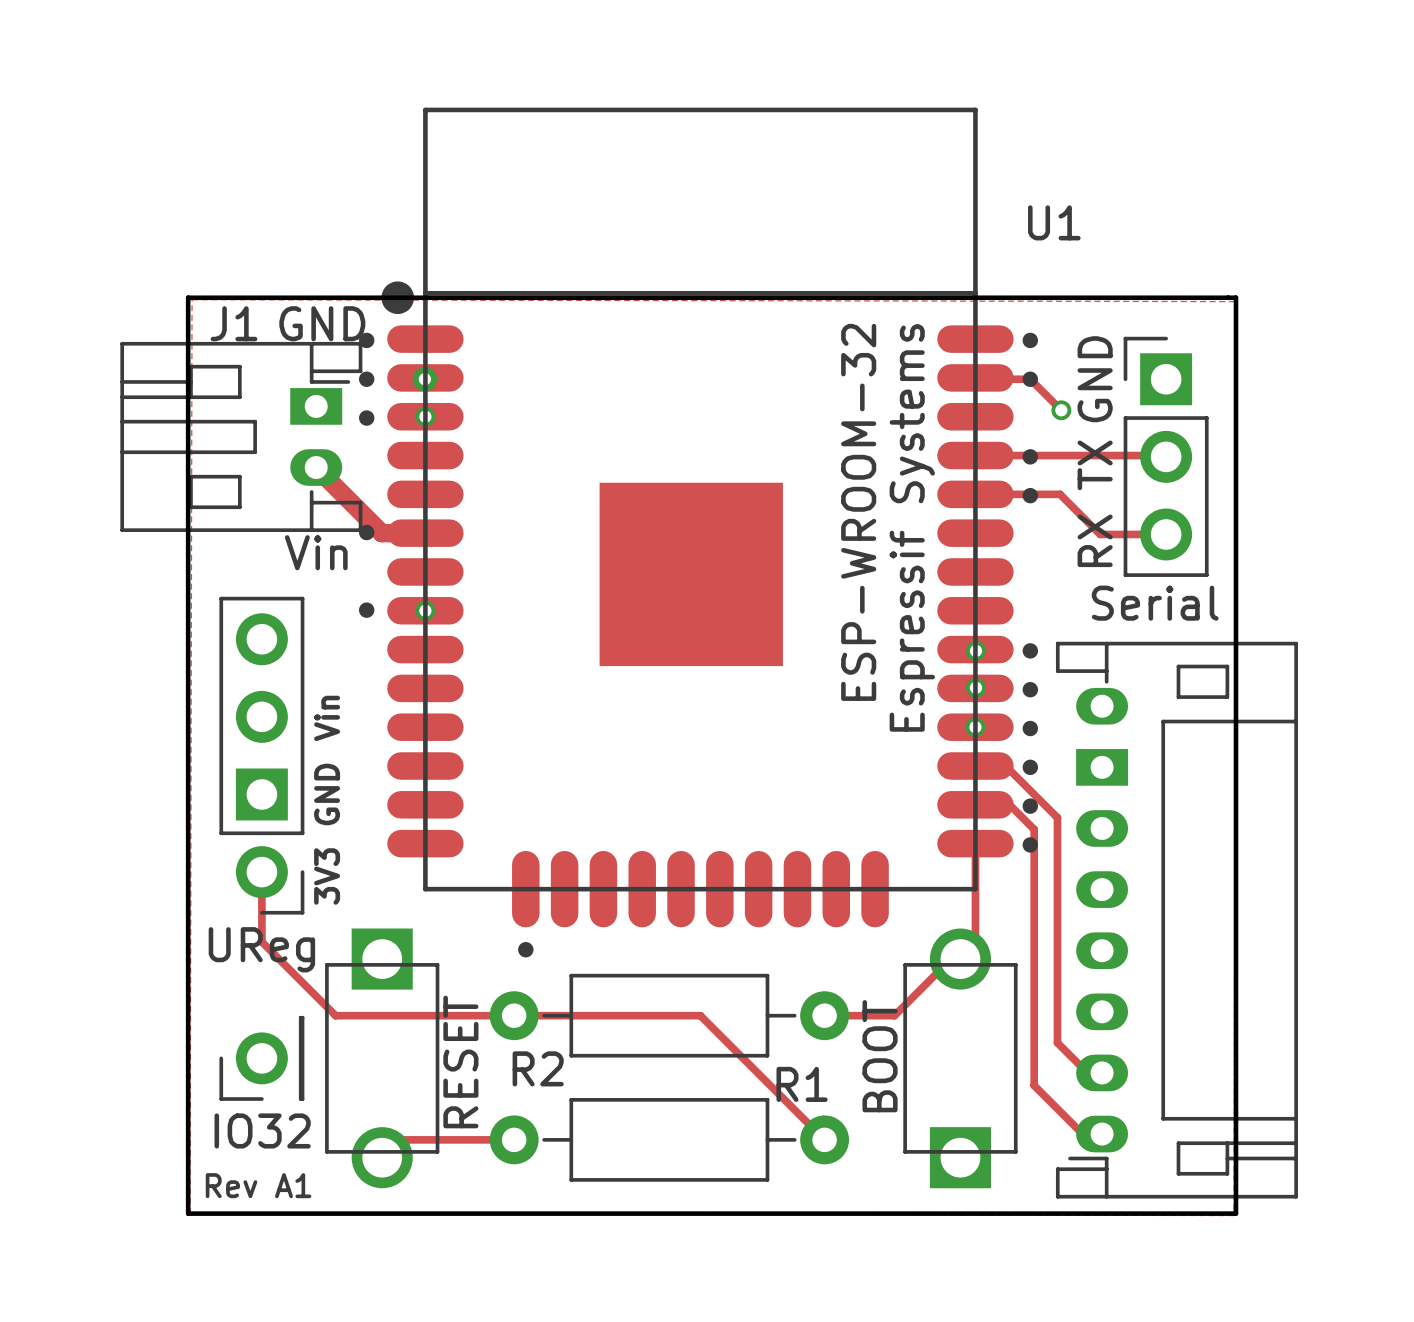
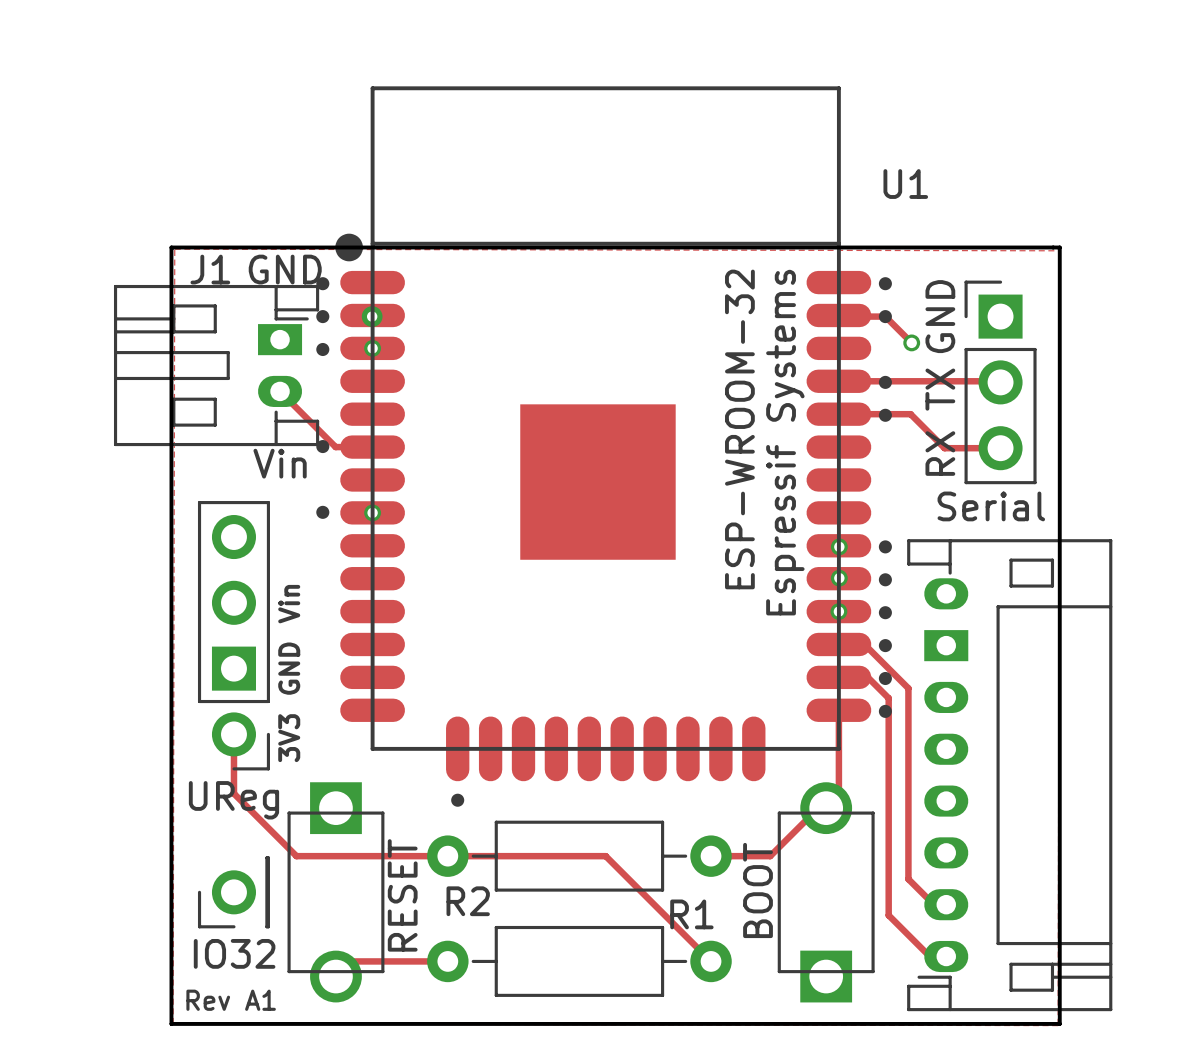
track width: thick (316, 467) (381, 533) (425, 533) -> thin (280, 391) (335, 447) (372, 447)

